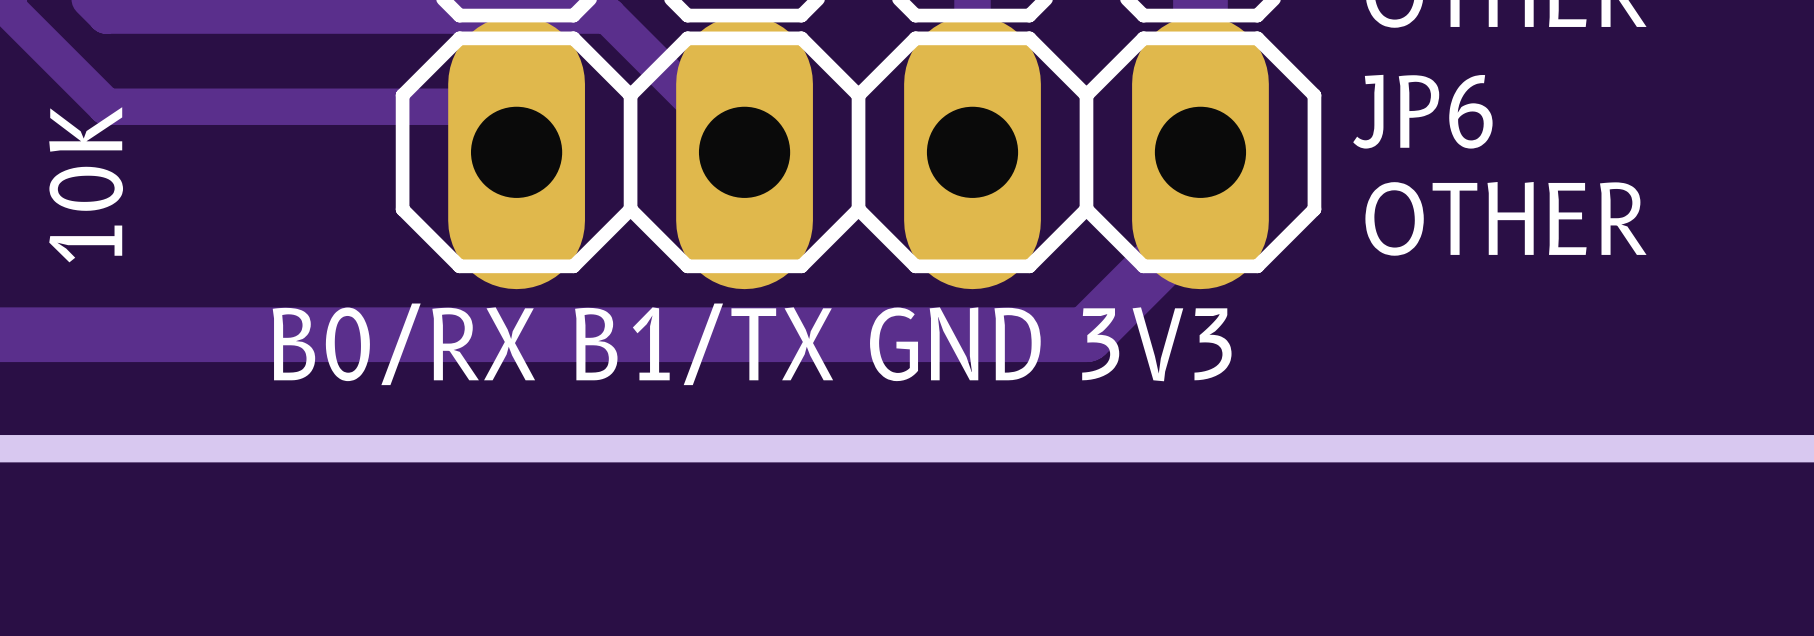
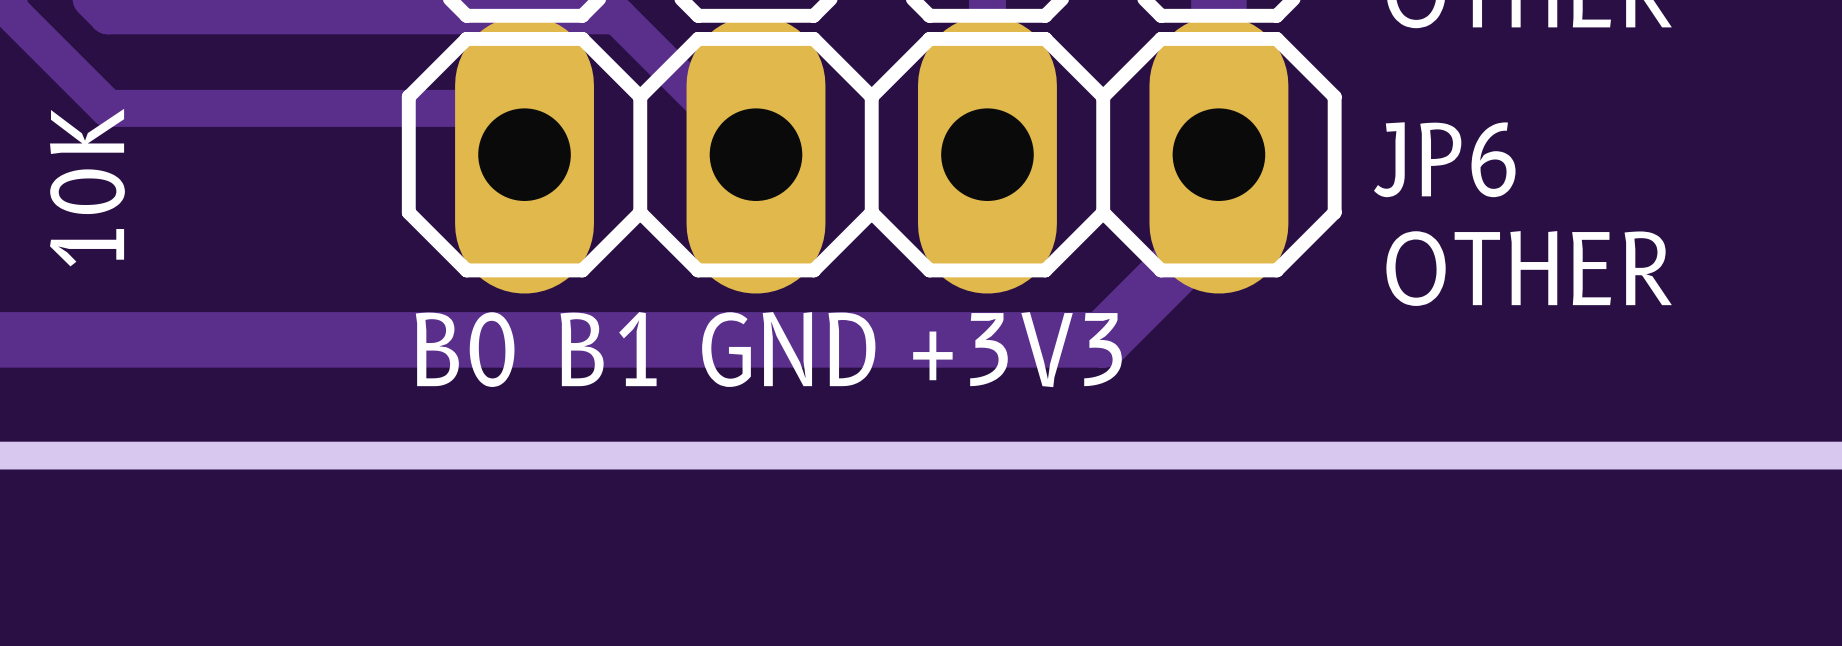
JP6 name position: JP6 (1422, 111) -> JP6 (1444, 159)
JP6 value position: OTHER (1505, 218) -> OTHER (1529, 268)
text: B0/RX B1/TX GND 3V3 (752, 344) -> B0 B1 GND +3V3 (768, 349)

